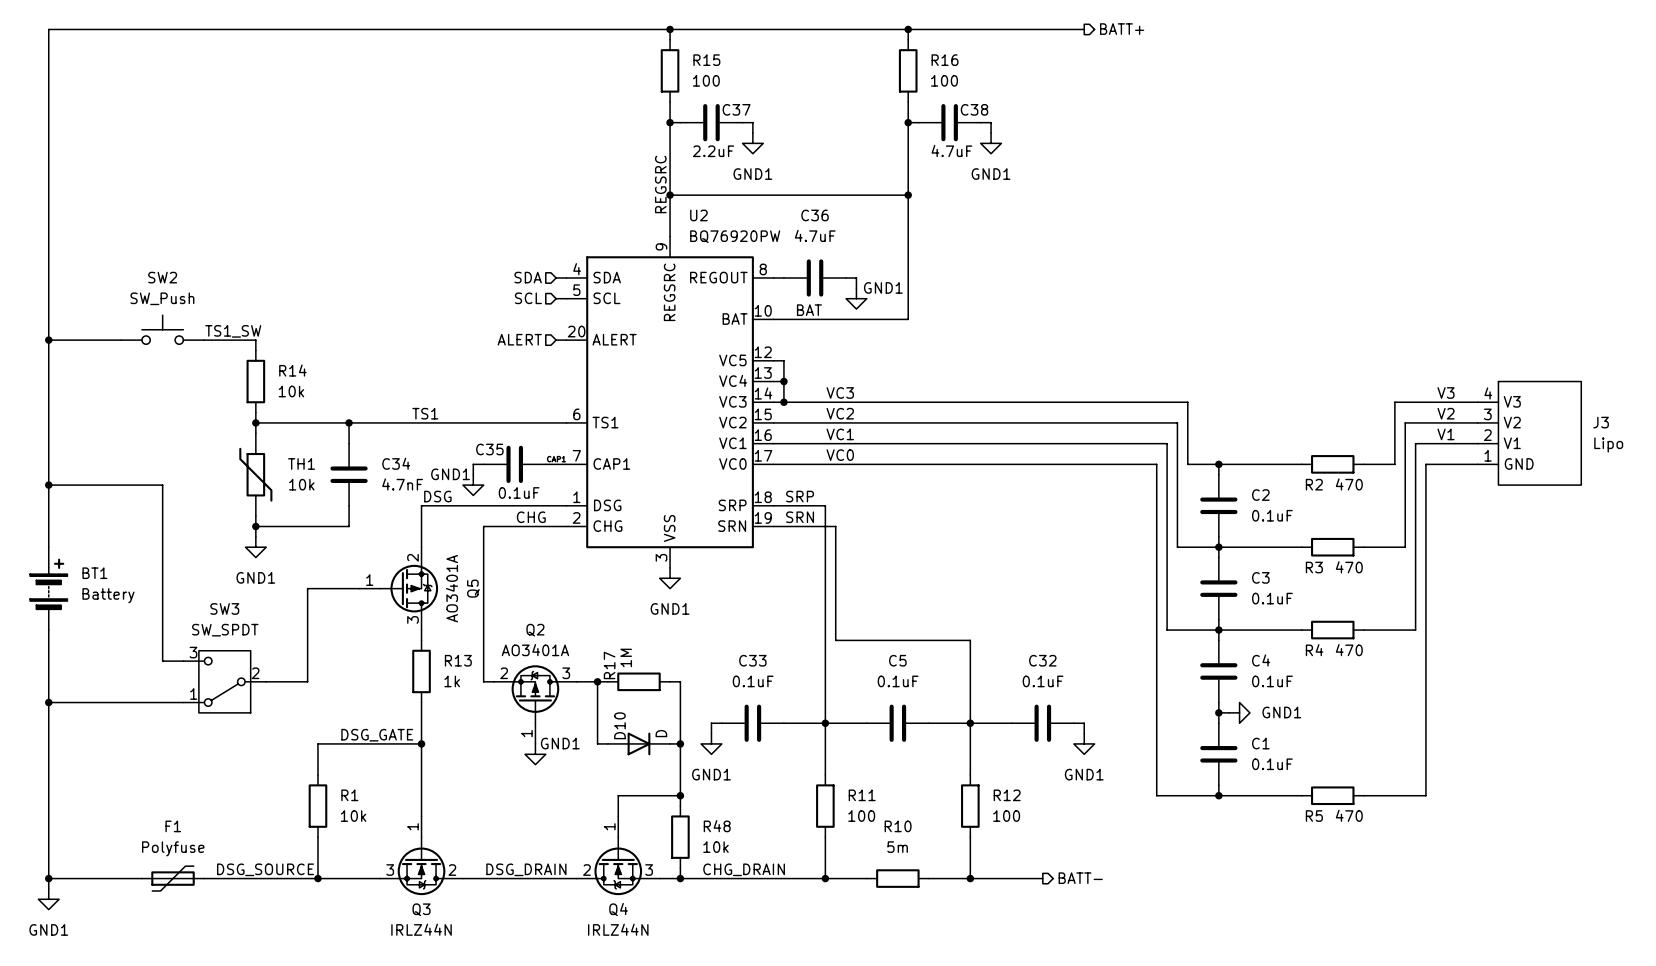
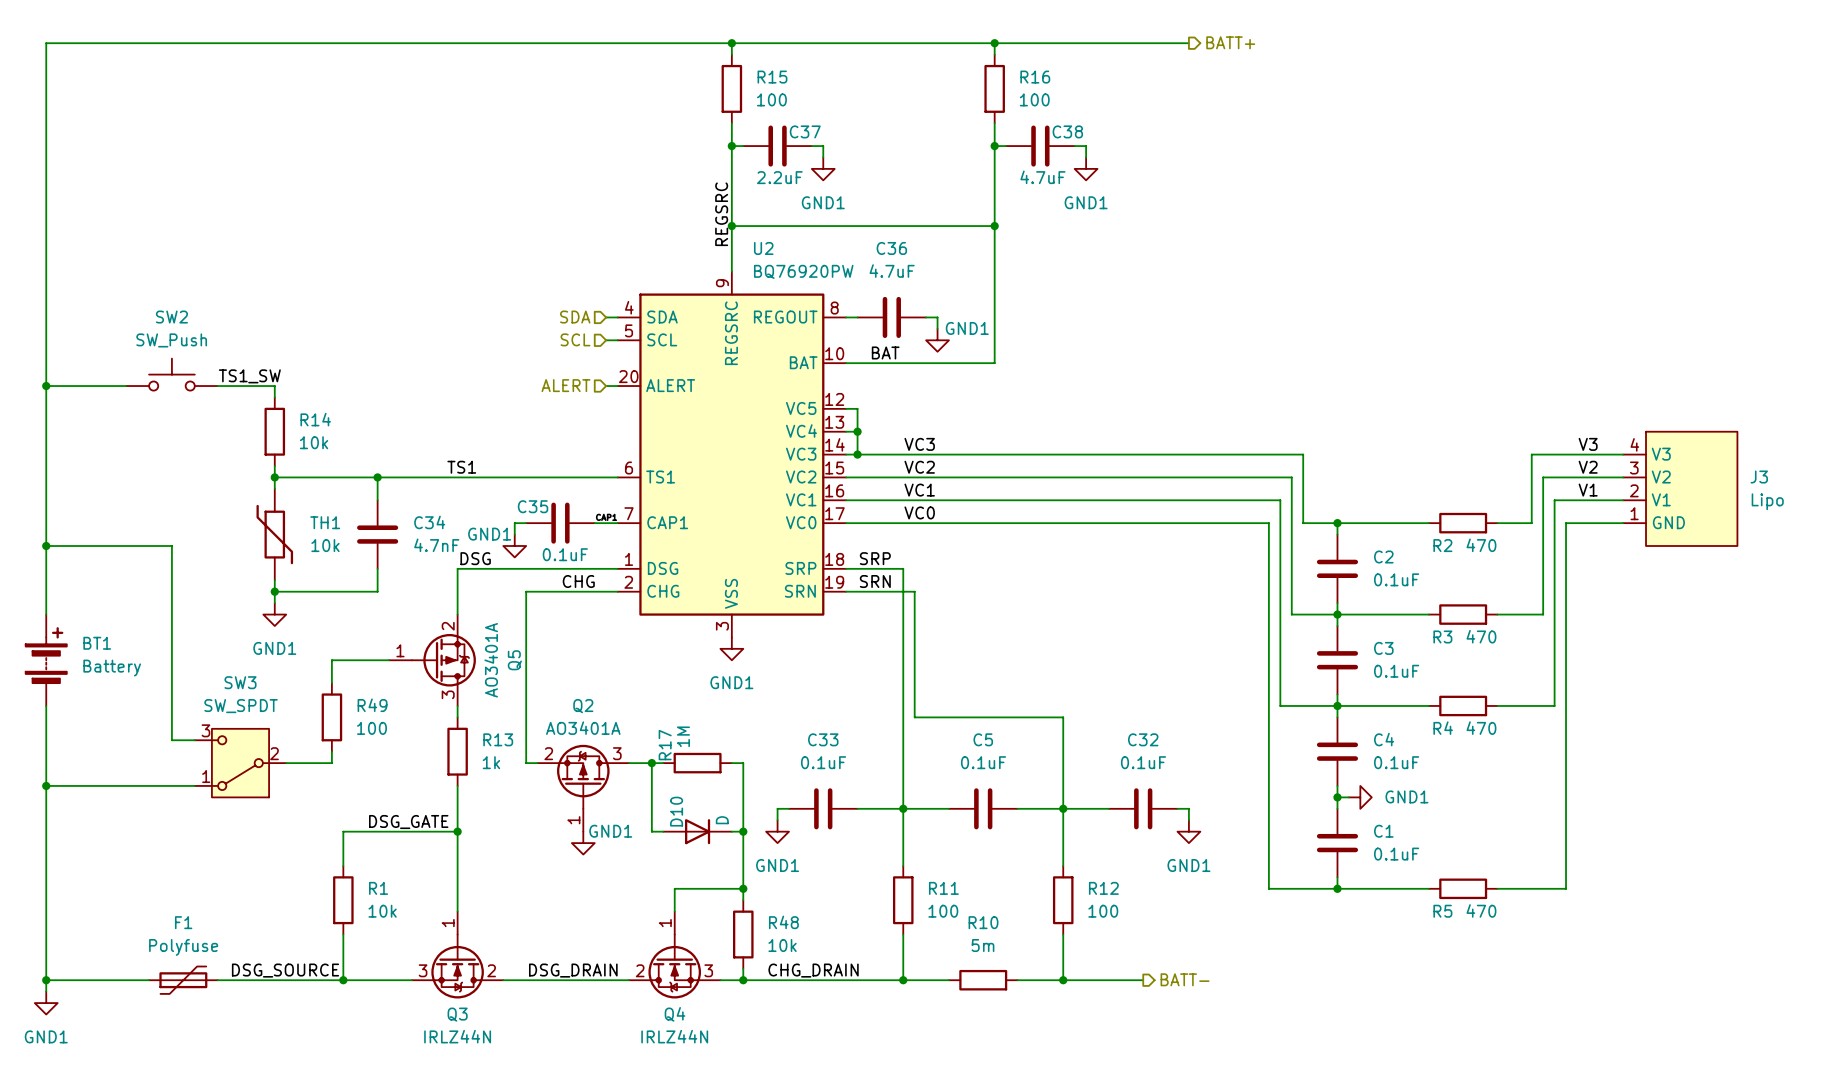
wire: (307, 609) (307, 671) -> none
R49: none -> 100 (331, 717)

